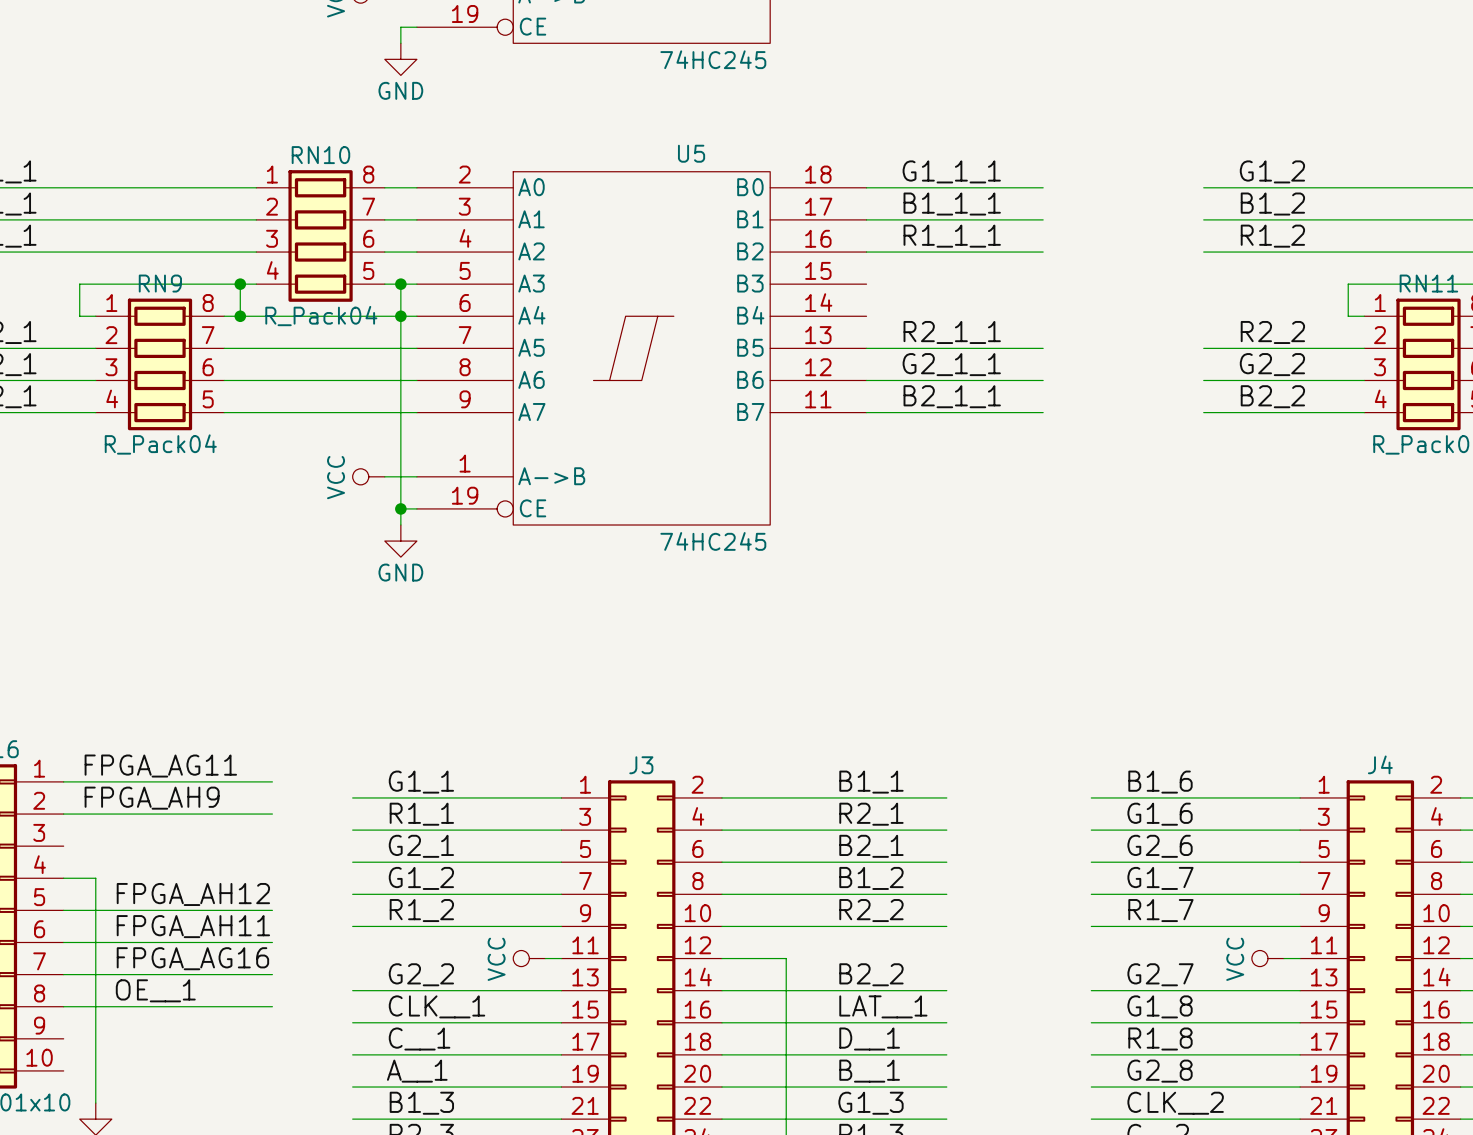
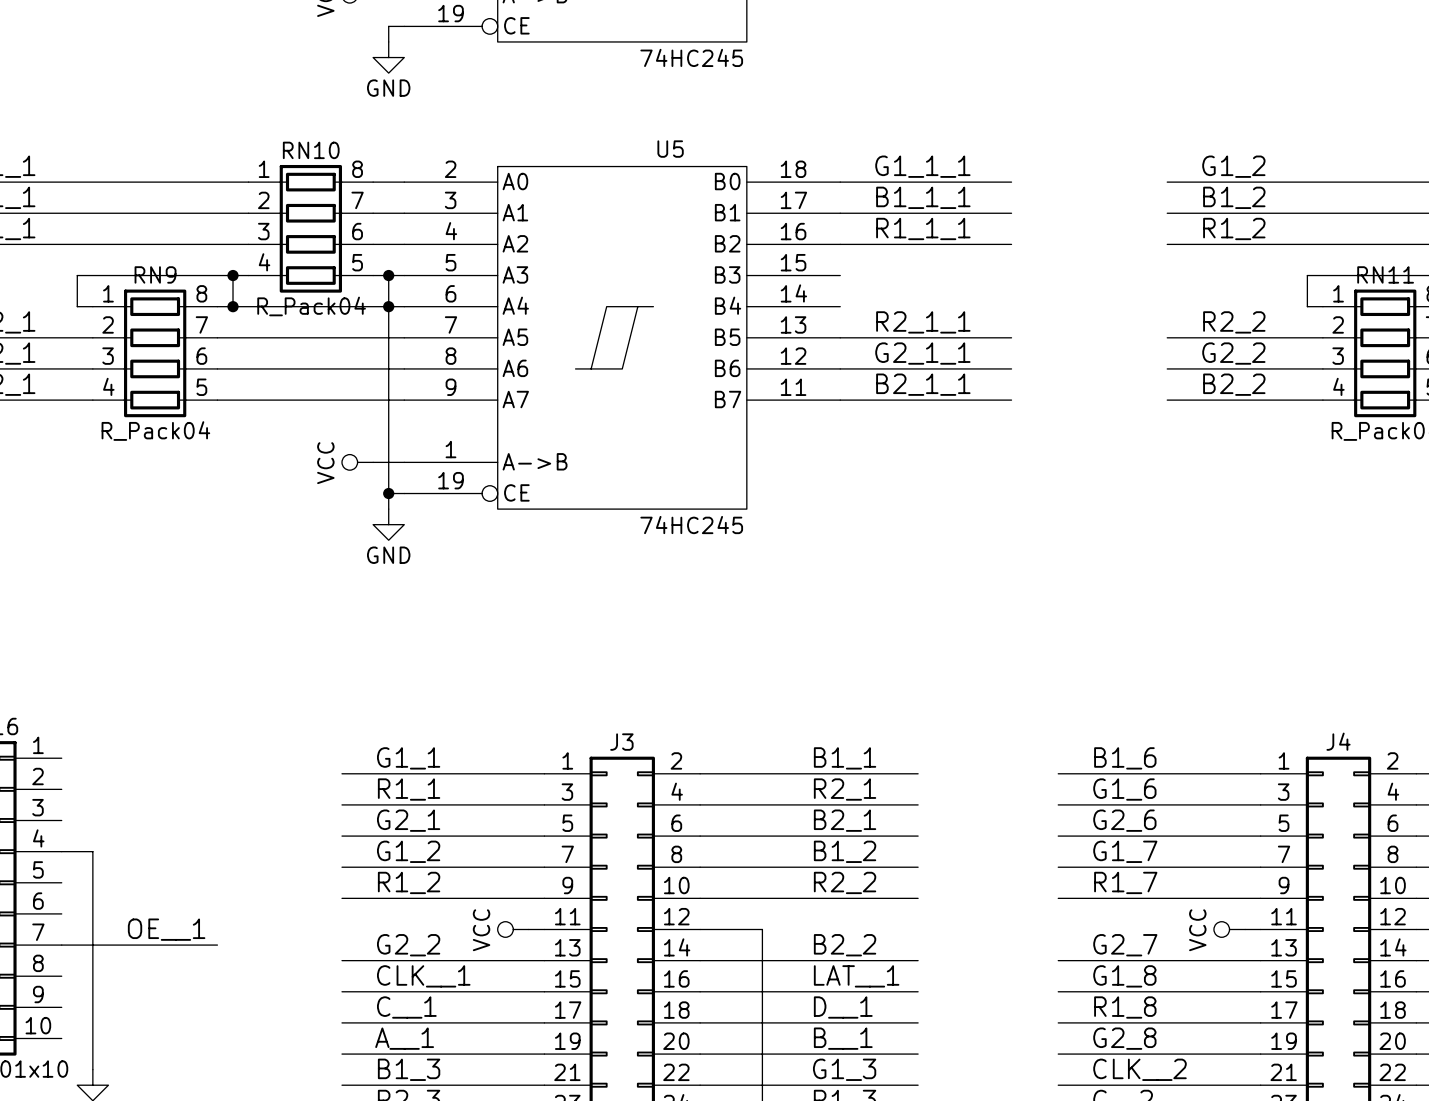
label: FPGA_AG11 (160, 766) -> none
wire: (63, 781) (272, 781) -> none
label: FPGA_AH9 (152, 798) -> none
wire: (63, 814) (272, 814) -> none
label: FPGA_AH12 (193, 894) -> none
wire: (63, 910) (272, 910) -> none
label: FPGA_AH11 (193, 926) -> none
wire: (63, 942) (272, 942) -> none
label: FPGA_AG16 (192, 958) -> none
wire: (224, 974) (272, 974) -> none
label position: OE__1 (155, 990) -> OE__1 (166, 929)
wire: (63, 1006) (272, 1006) -> none

